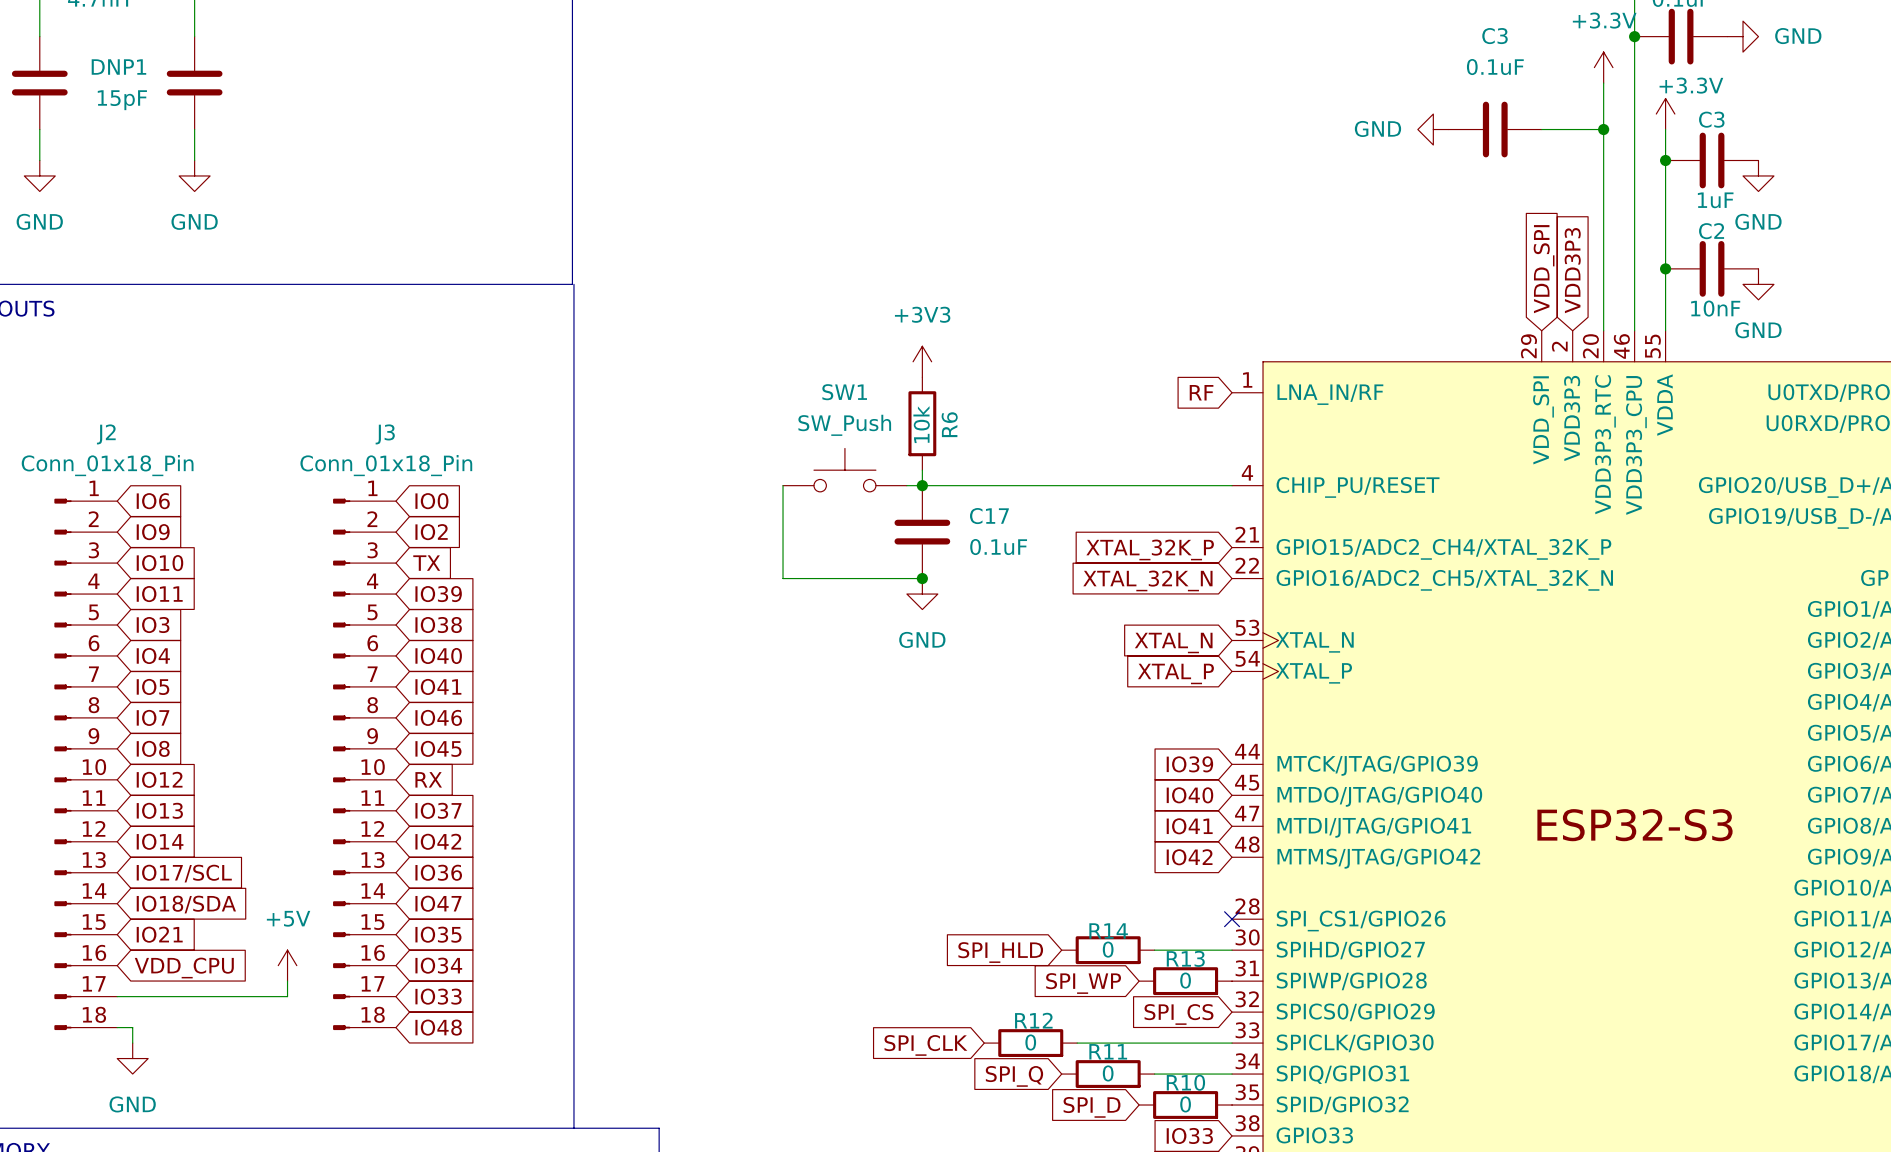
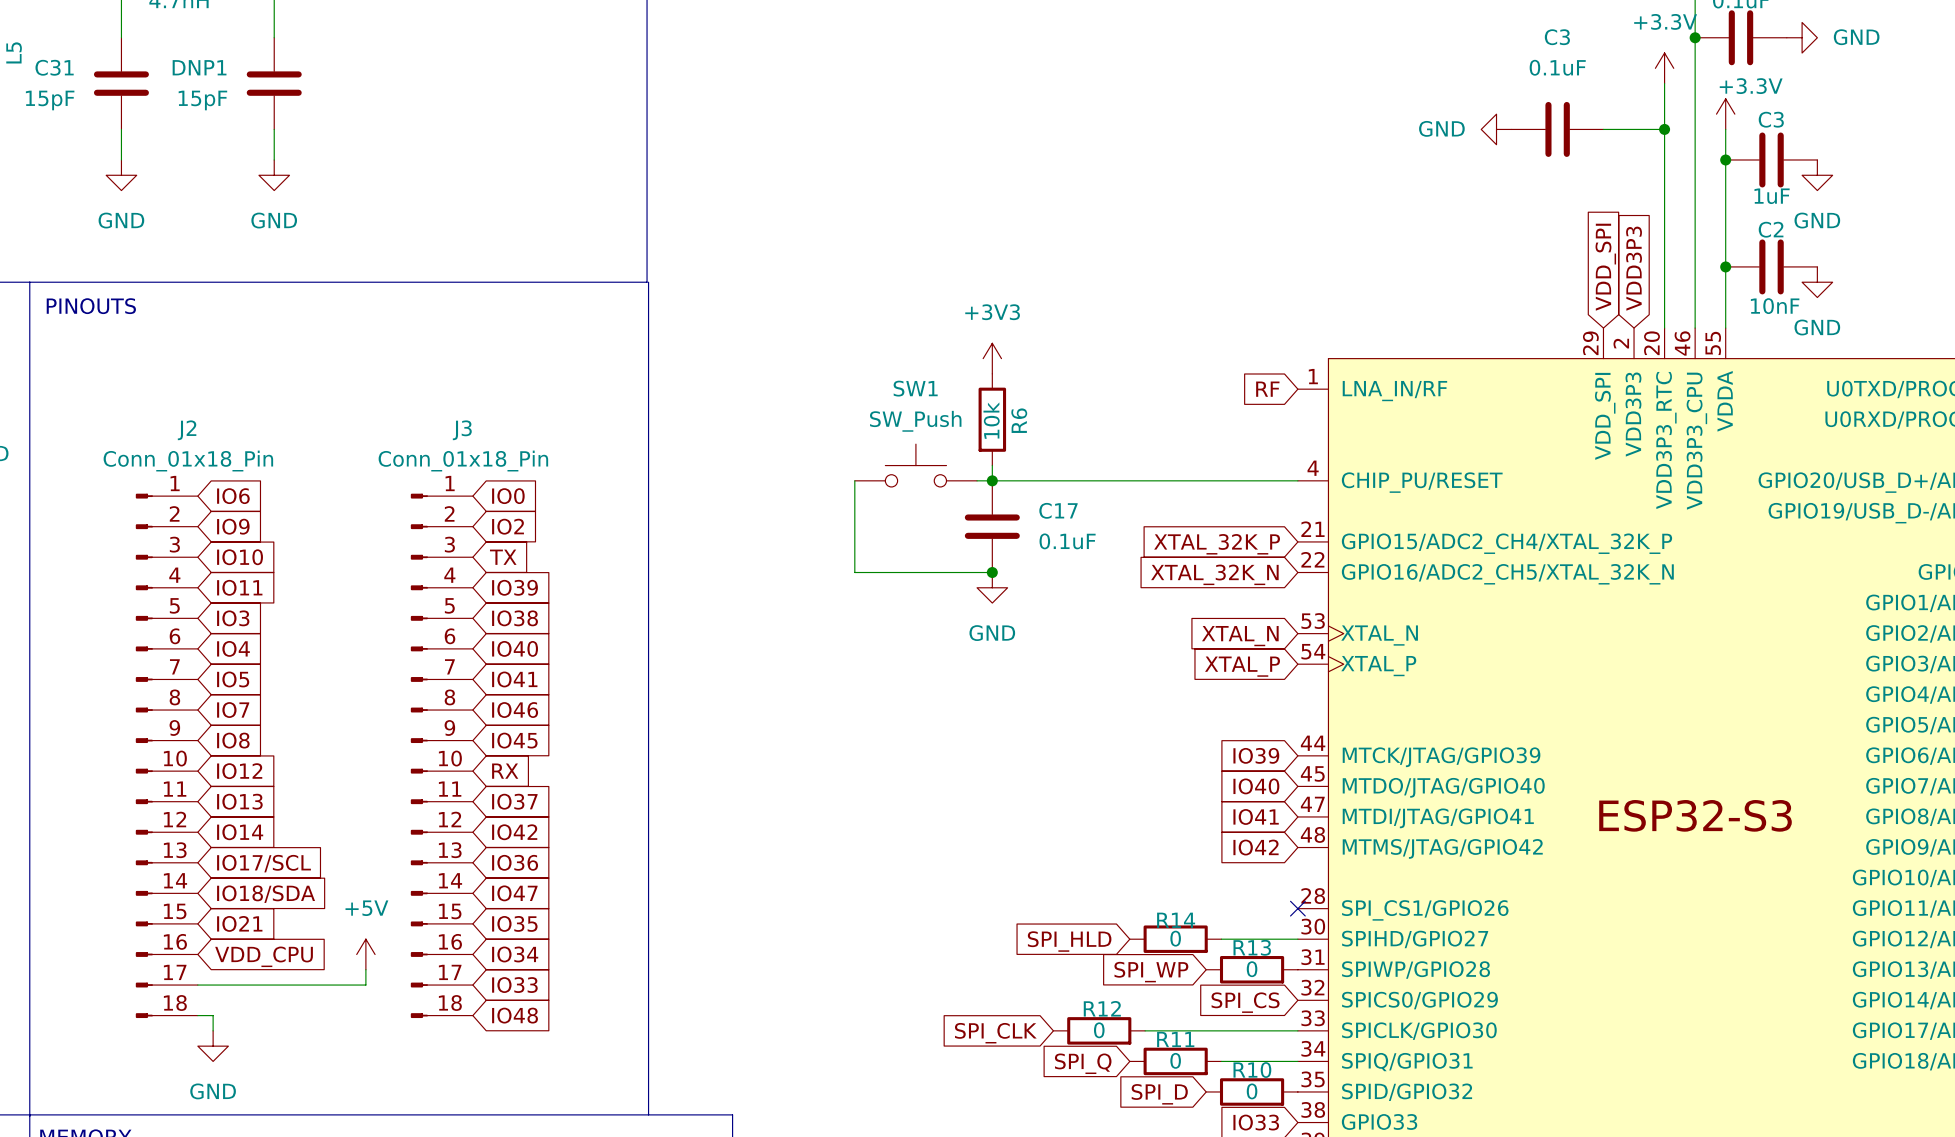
1uF value: C3 (1711, 119) -> 1uF (1772, 196)
1uF name: 1uF (1715, 200) -> C3 (1771, 119)

